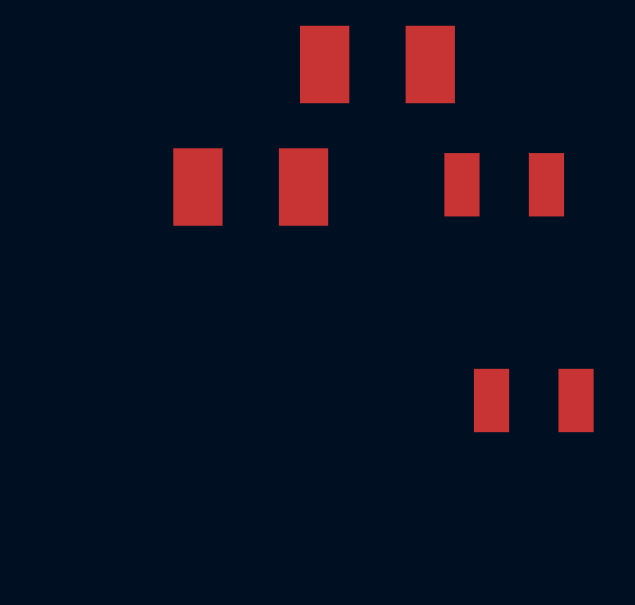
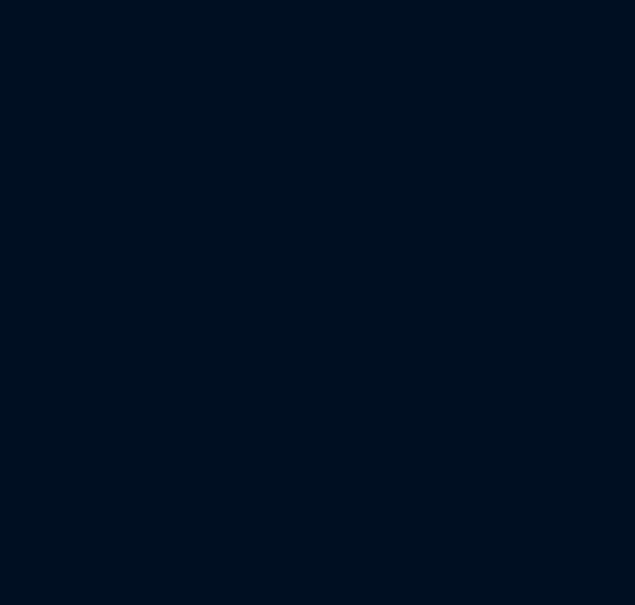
part: (377, 64) -> none
part: (504, 184) -> none
part: (250, 187) -> none
part: (533, 400) -> none

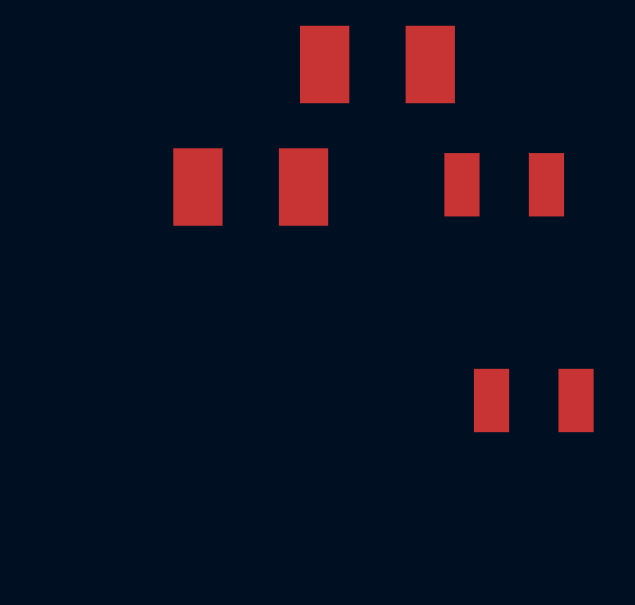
part: none -> (377, 64)
part: none -> (504, 184)
part: none -> (250, 187)
part: none -> (533, 400)

